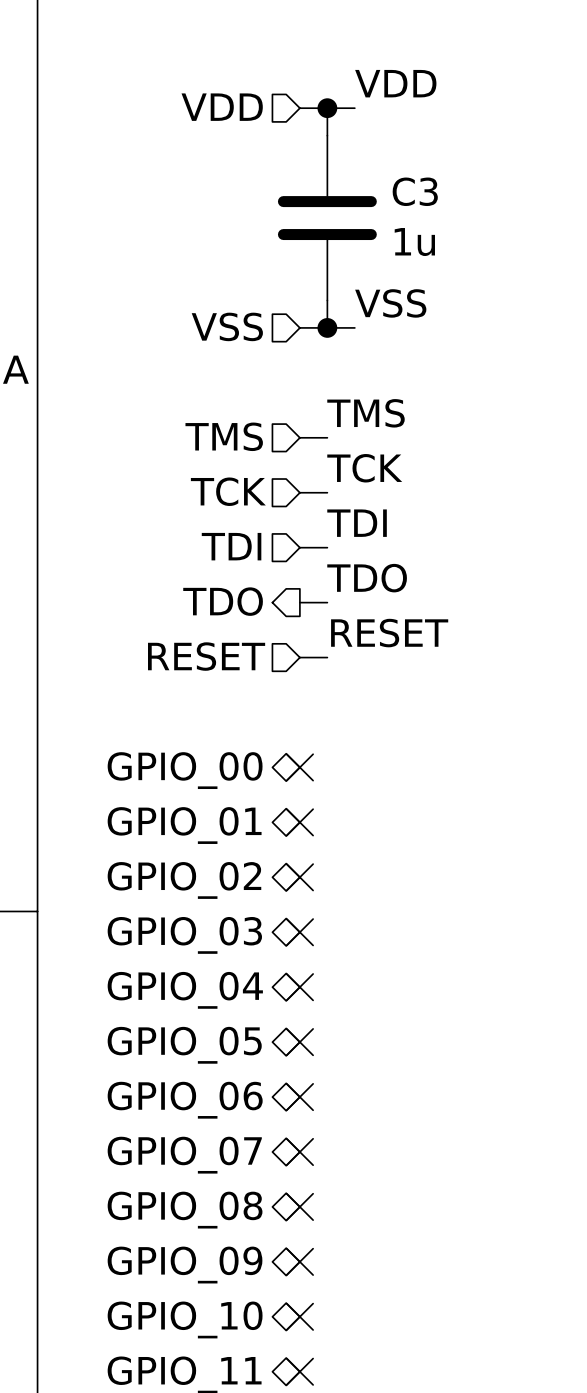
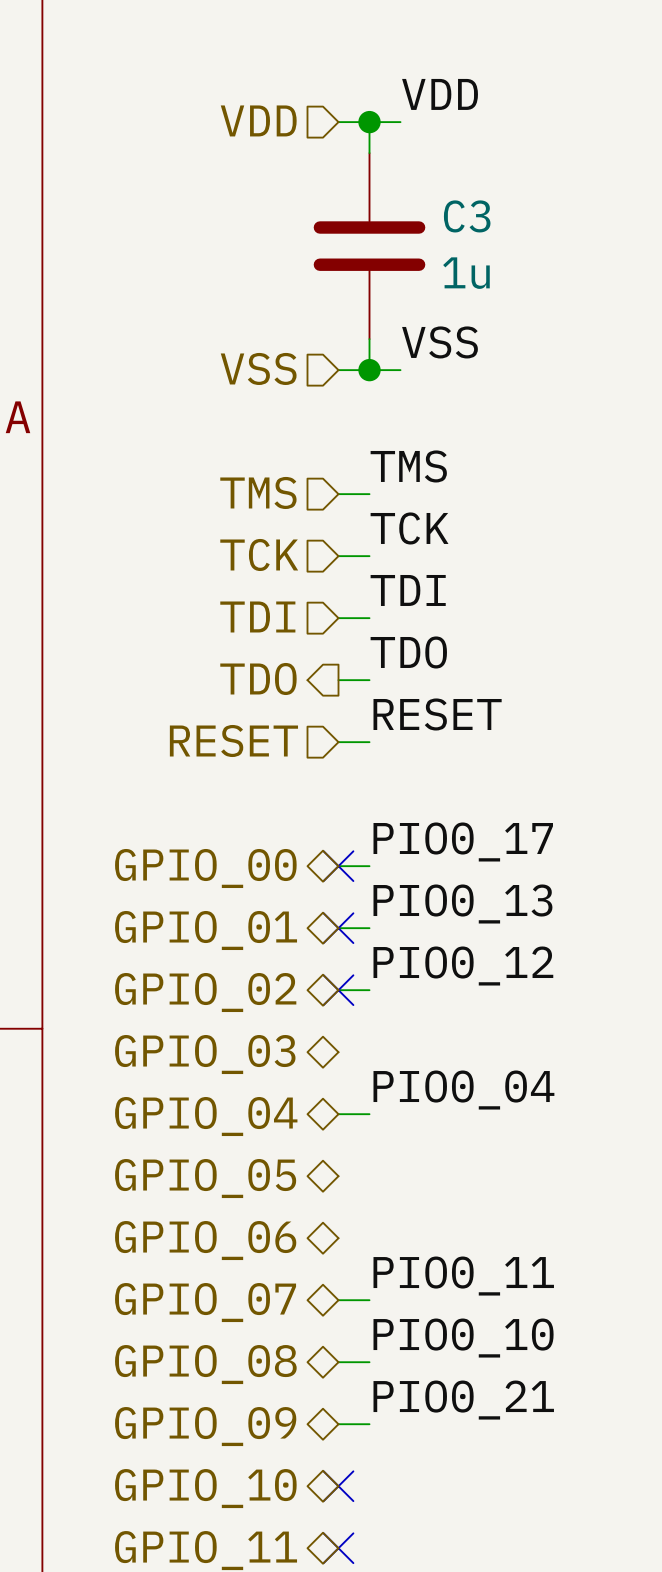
label: none -> PIO0_17 (463, 841)
wire: none -> (338, 866) (369, 866)
label: none -> PIO0_13 (462, 903)
wire: none -> (338, 928) (369, 928)
label: none -> PIO0_12 (463, 966)
wire: none -> (338, 990) (369, 990)
no-connect mark: (299, 932) -> none
label: none -> PIO0_04 (463, 1090)
wire: none -> (338, 1114) (369, 1114)
no-connect mark: (299, 987) -> none
no-connect mark: (299, 1042) -> none
no-connect mark: (299, 1097) -> none
label: none -> PIO0_11 (463, 1276)
wire: none -> (338, 1300) (369, 1300)
no-connect mark: (299, 1151) -> none
label: none -> PIO0_10 (463, 1338)
wire: none -> (338, 1362) (369, 1362)
no-connect mark: (299, 1206) -> none
label: none -> PIO0_21 (463, 1400)
wire: none -> (338, 1424) (369, 1424)
no-connect mark: (299, 1261) -> none

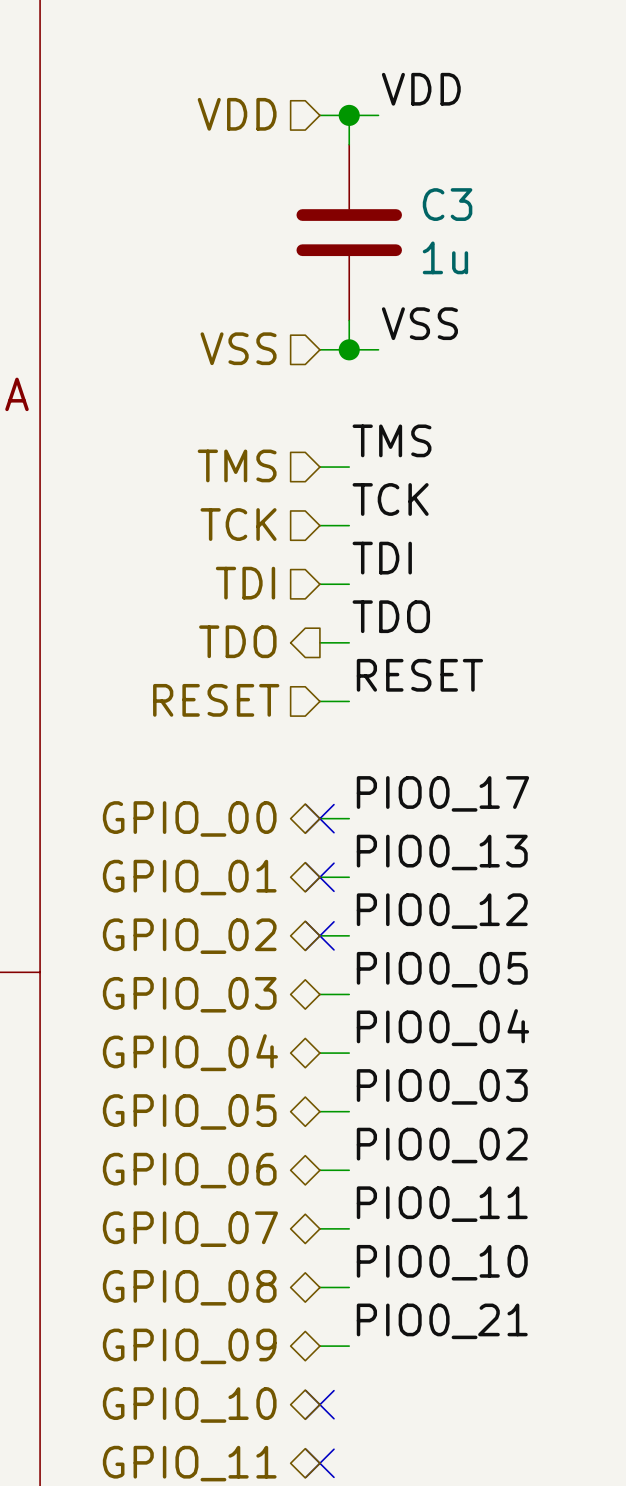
label: none -> PIO0_05 (442, 969)
wire: none -> (319, 994) (349, 994)
label: none -> PIO0_03 (442, 1086)
wire: none -> (319, 1111) (349, 1111)
label: none -> PIO0_02 (442, 1145)
wire: none -> (319, 1170) (349, 1170)

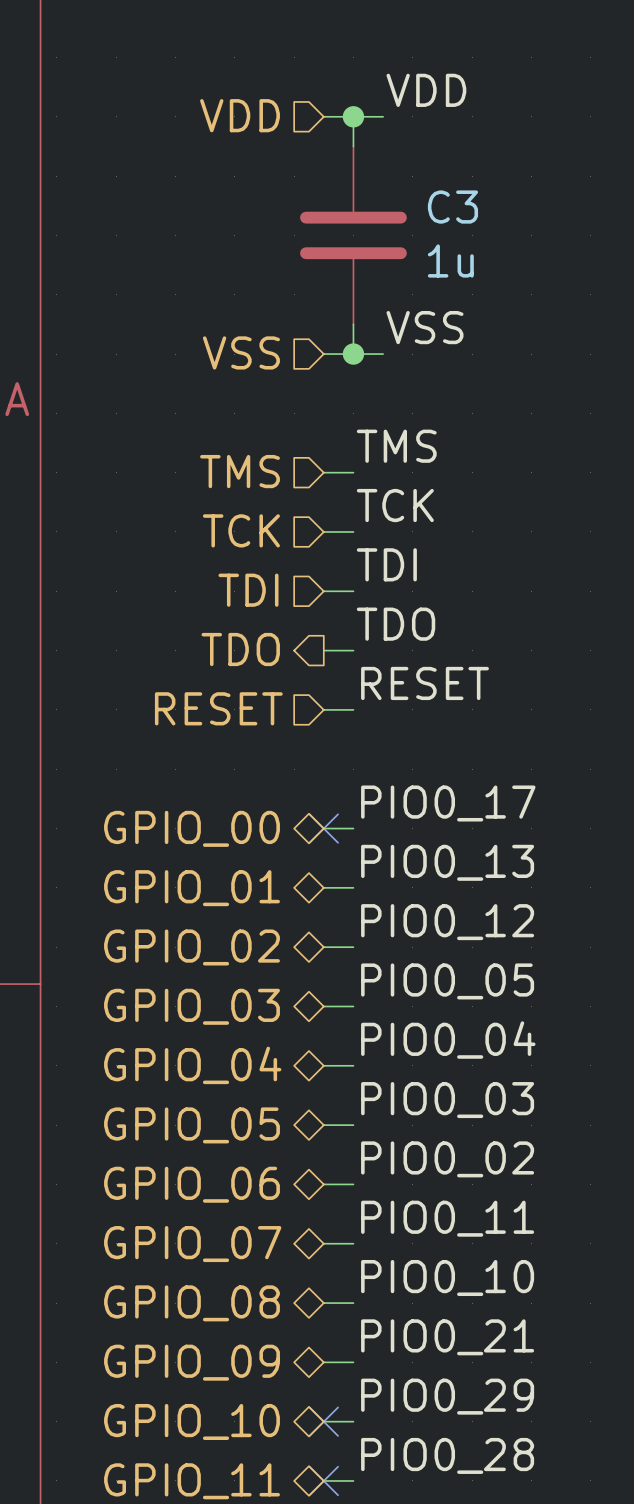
no-connect mark: (319, 877) -> none
no-connect mark: (319, 935) -> none
label: none -> PIO0_29 (447, 1396)
wire: none -> (323, 1421) (353, 1421)
label: none -> PIO0_28 (447, 1455)
wire: none -> (323, 1480) (353, 1480)

